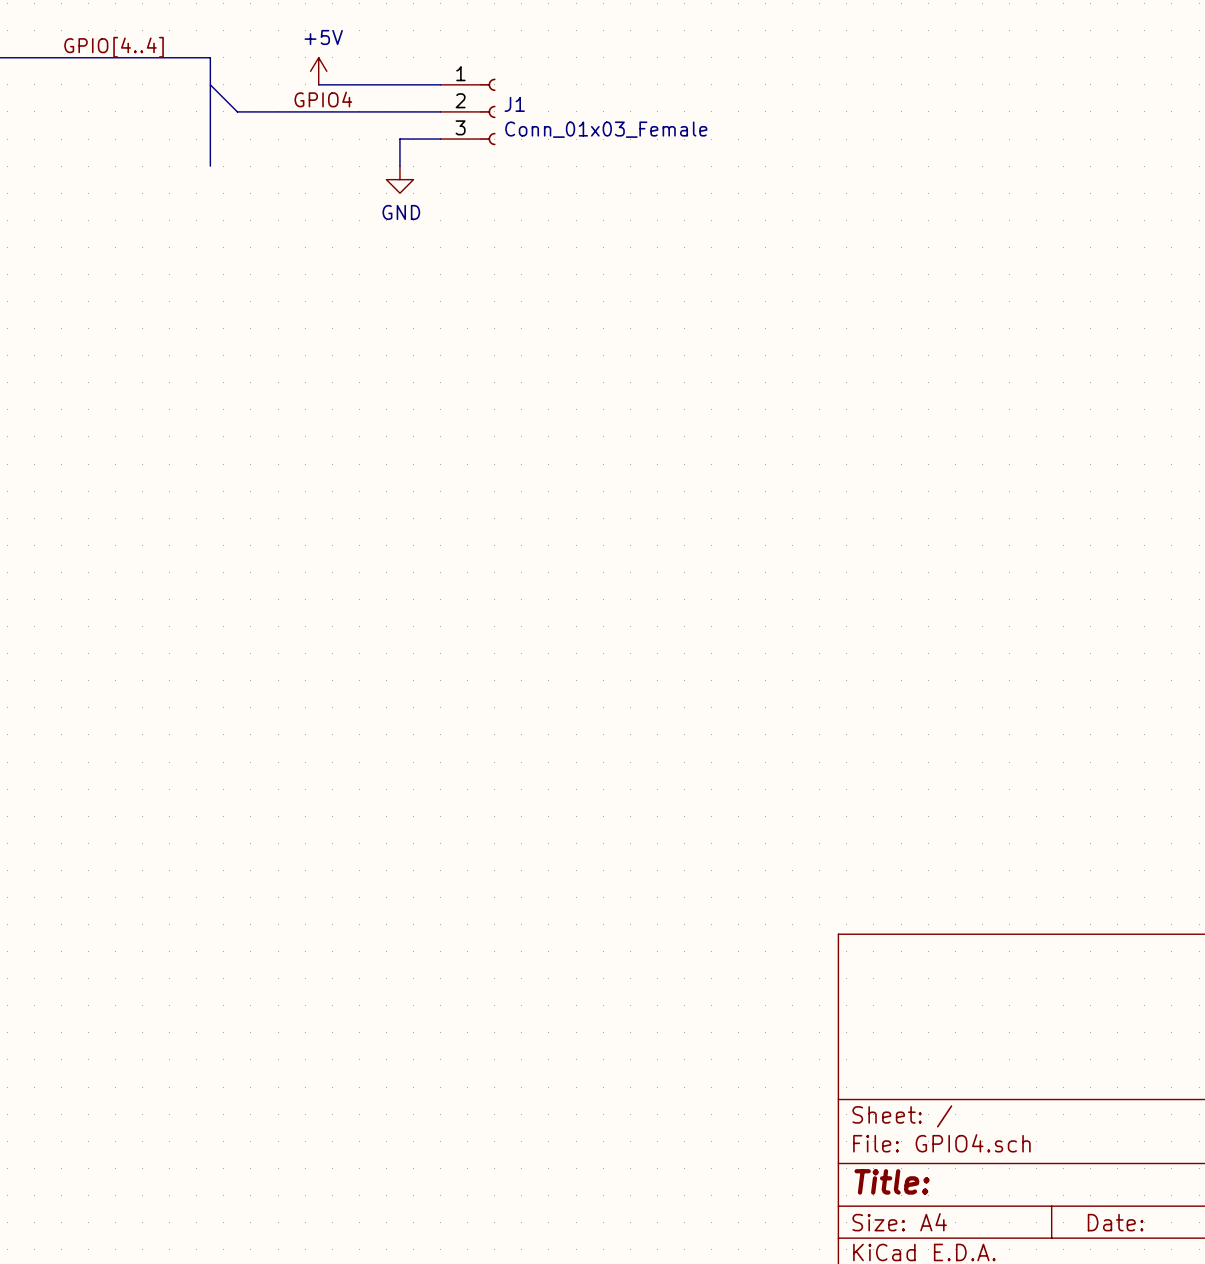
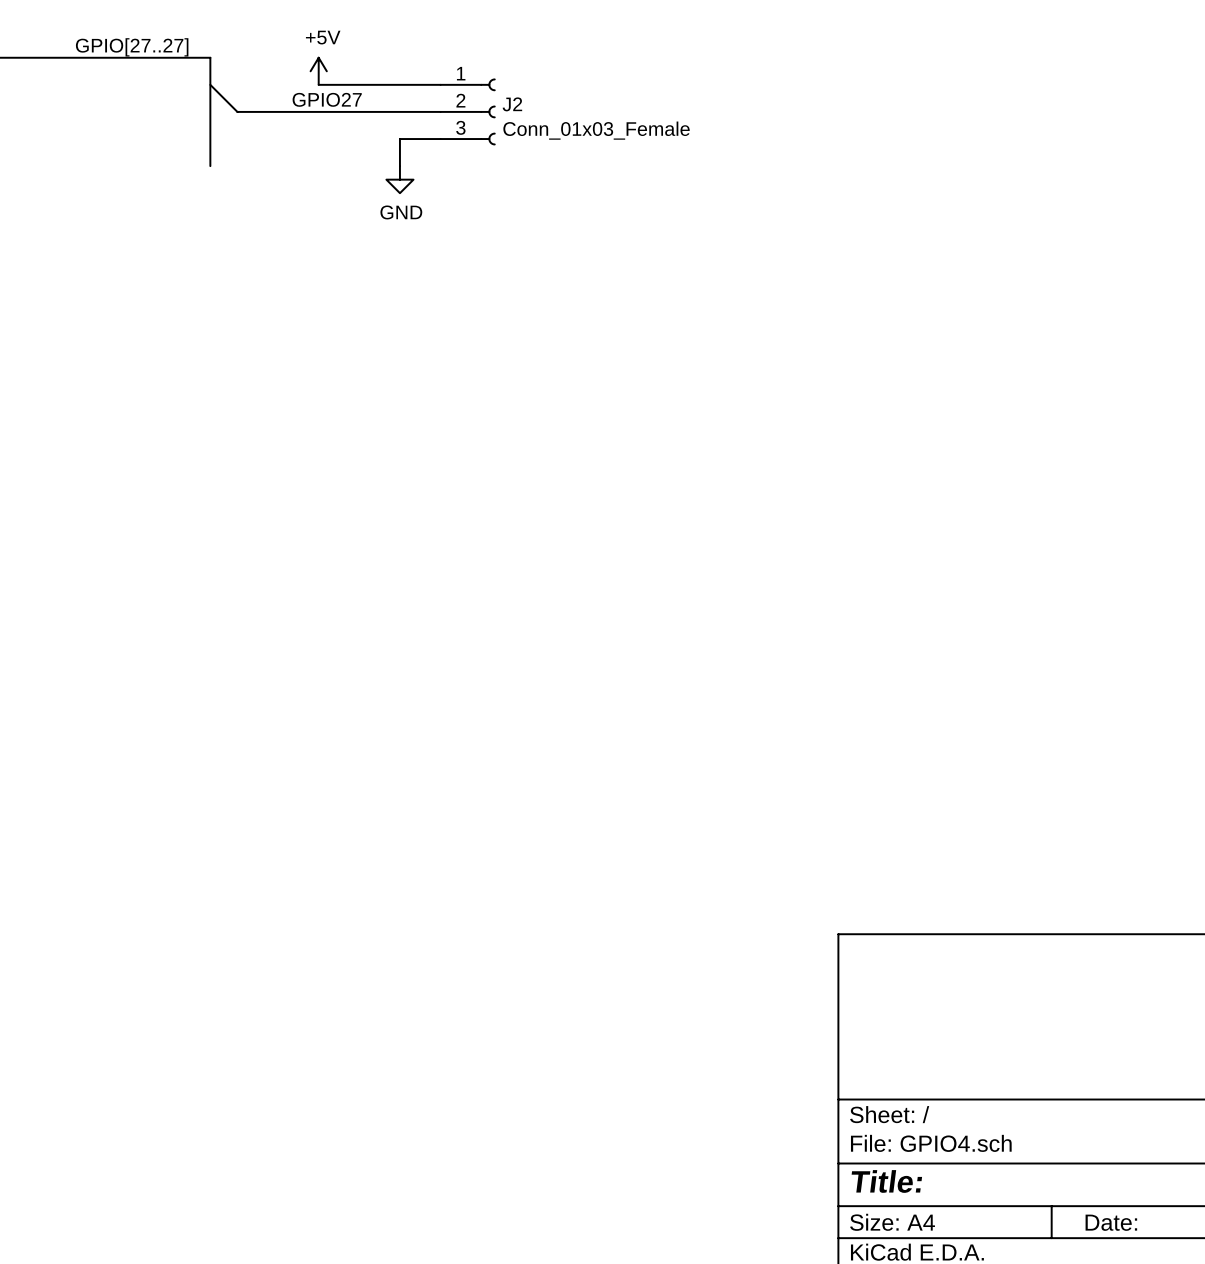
label: GPIO[4..4] (114, 47) -> GPIO[27..27] (132, 47)
label: GPIO4 (323, 99) -> GPIO27 (327, 99)
J1 name: J1 (514, 104) -> J2 (512, 104)

